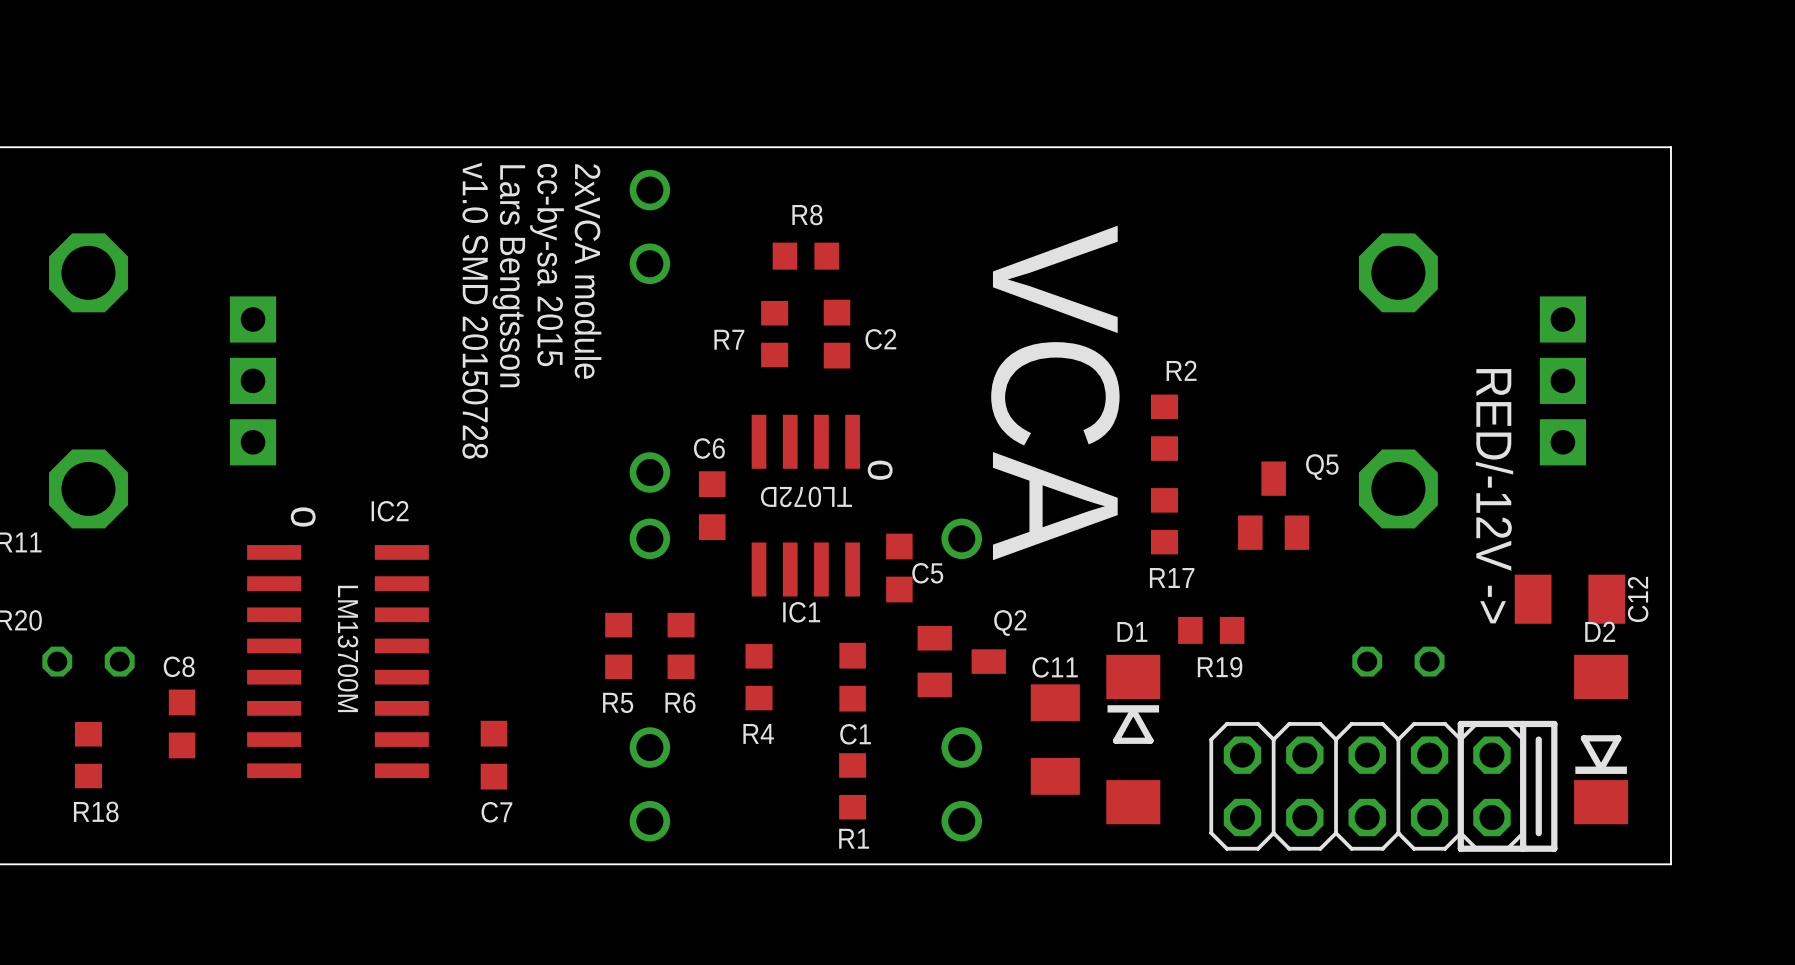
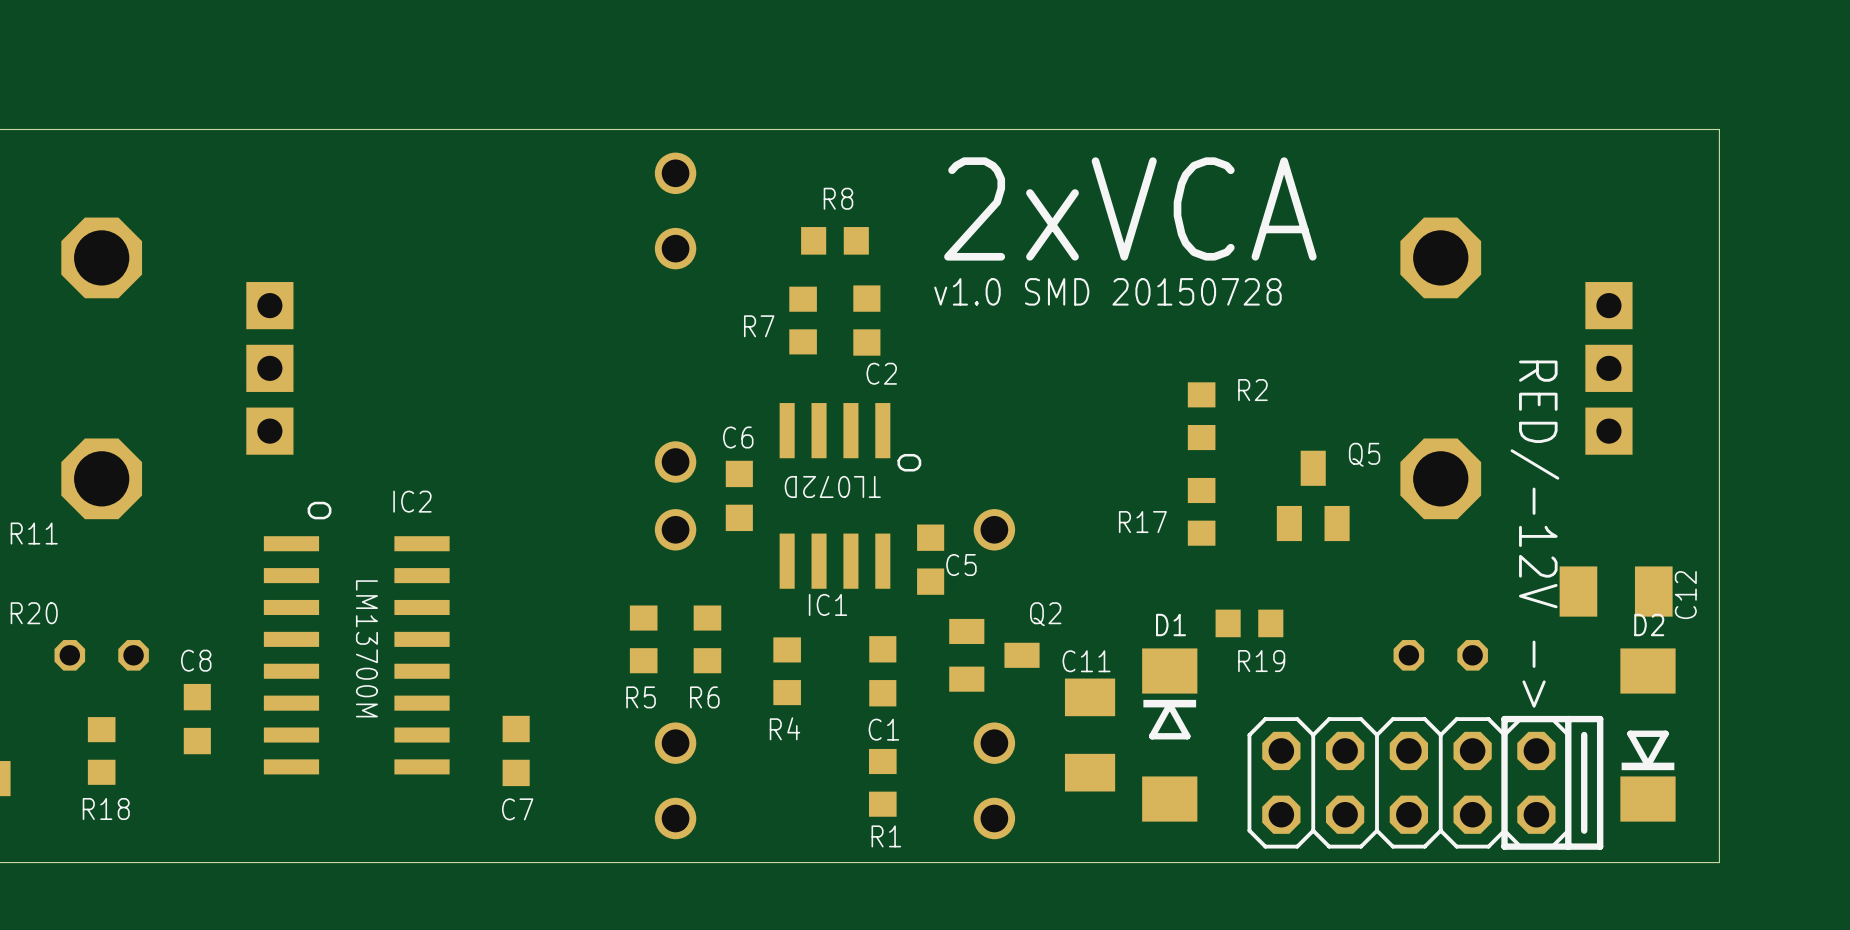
text: cc-by-sa 2015 (546, 265) -> none
text: 2xVCA module (587, 271) -> none
text: Lars Bengtsson (508, 276) -> none
text rotation: 0° (475, 310) -> 90° counterclockwise (1107, 291)
text position: v1.0 SMD 20150728 (475, 310) -> v1.0 SMD 20150728 (1107, 291)
C2 name position: C2 (880, 339) -> C2 (881, 373)
R2 name position: R2 (1181, 370) -> R2 (1252, 390)
text: VCA (1055, 392) -> 2xVCA (1130, 208)
R17 name position: R17 (1172, 578) -> R17 (1142, 522)

